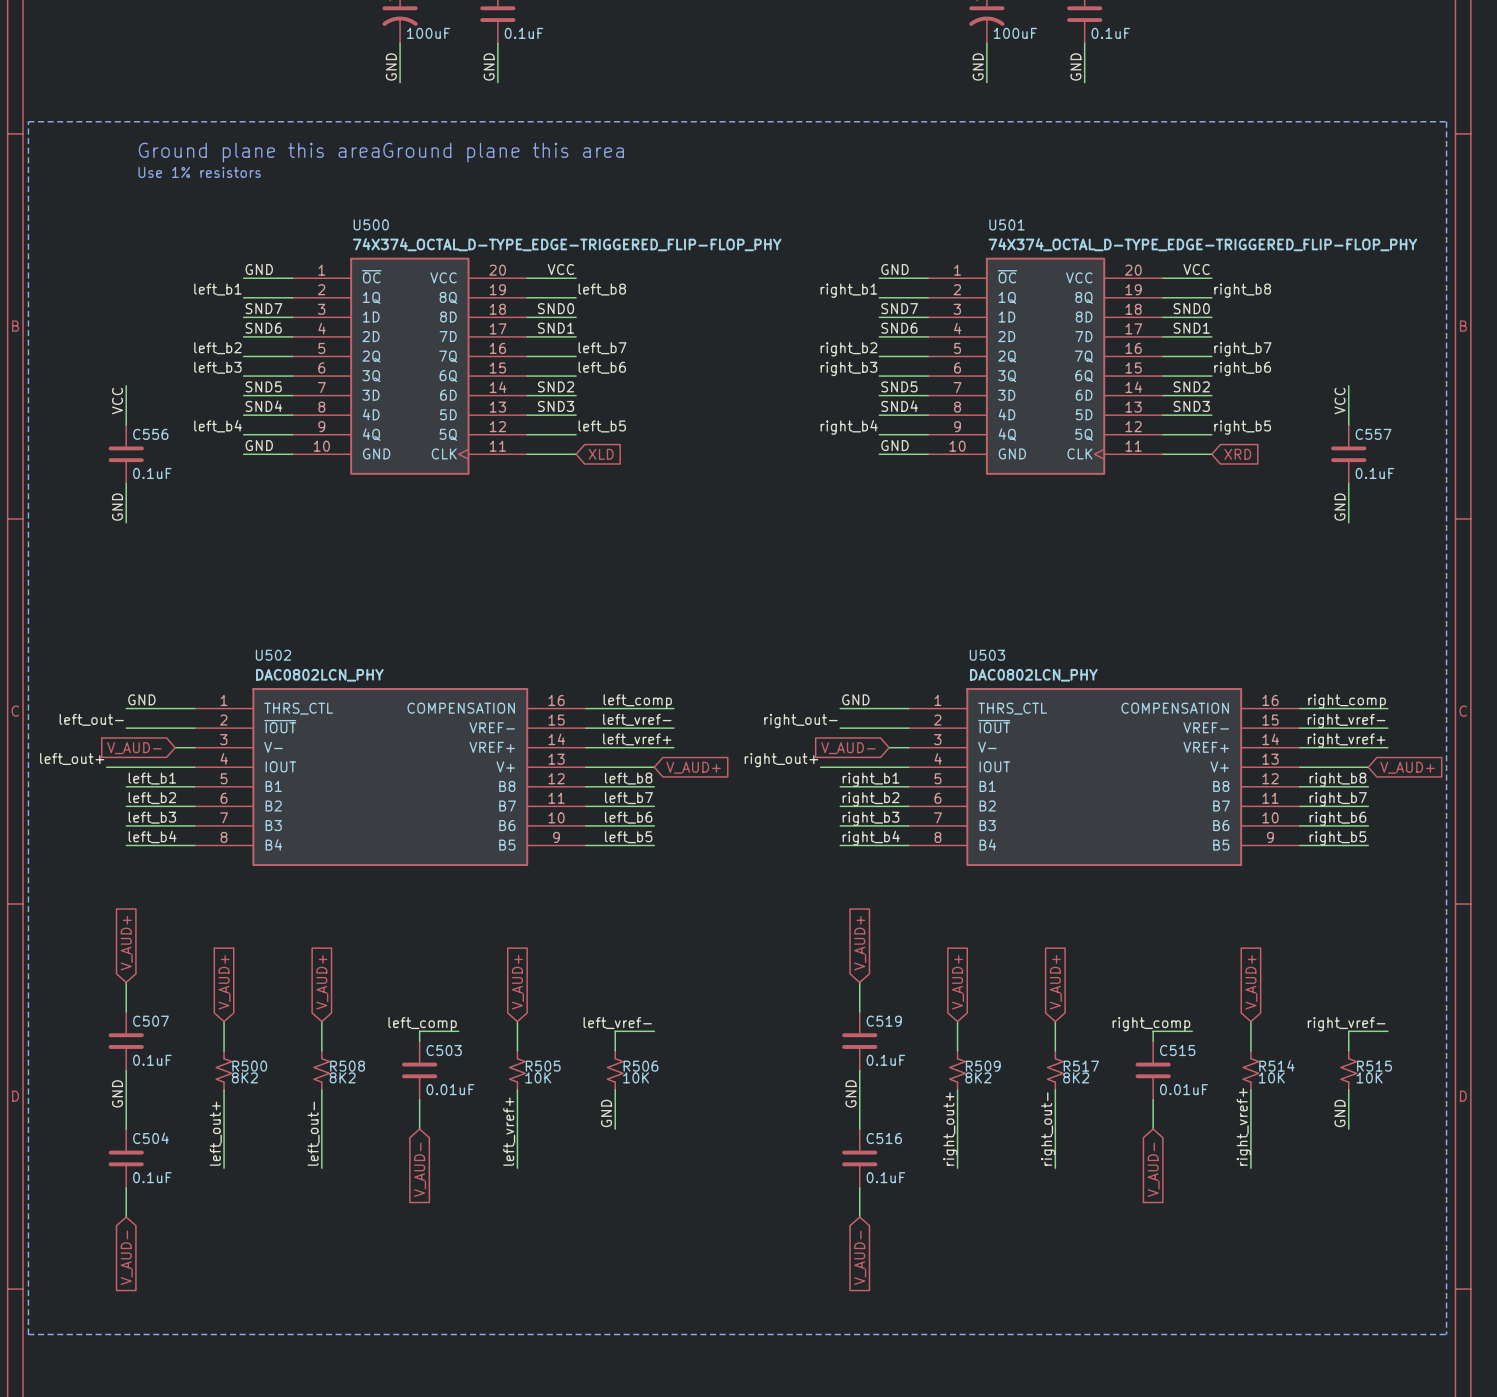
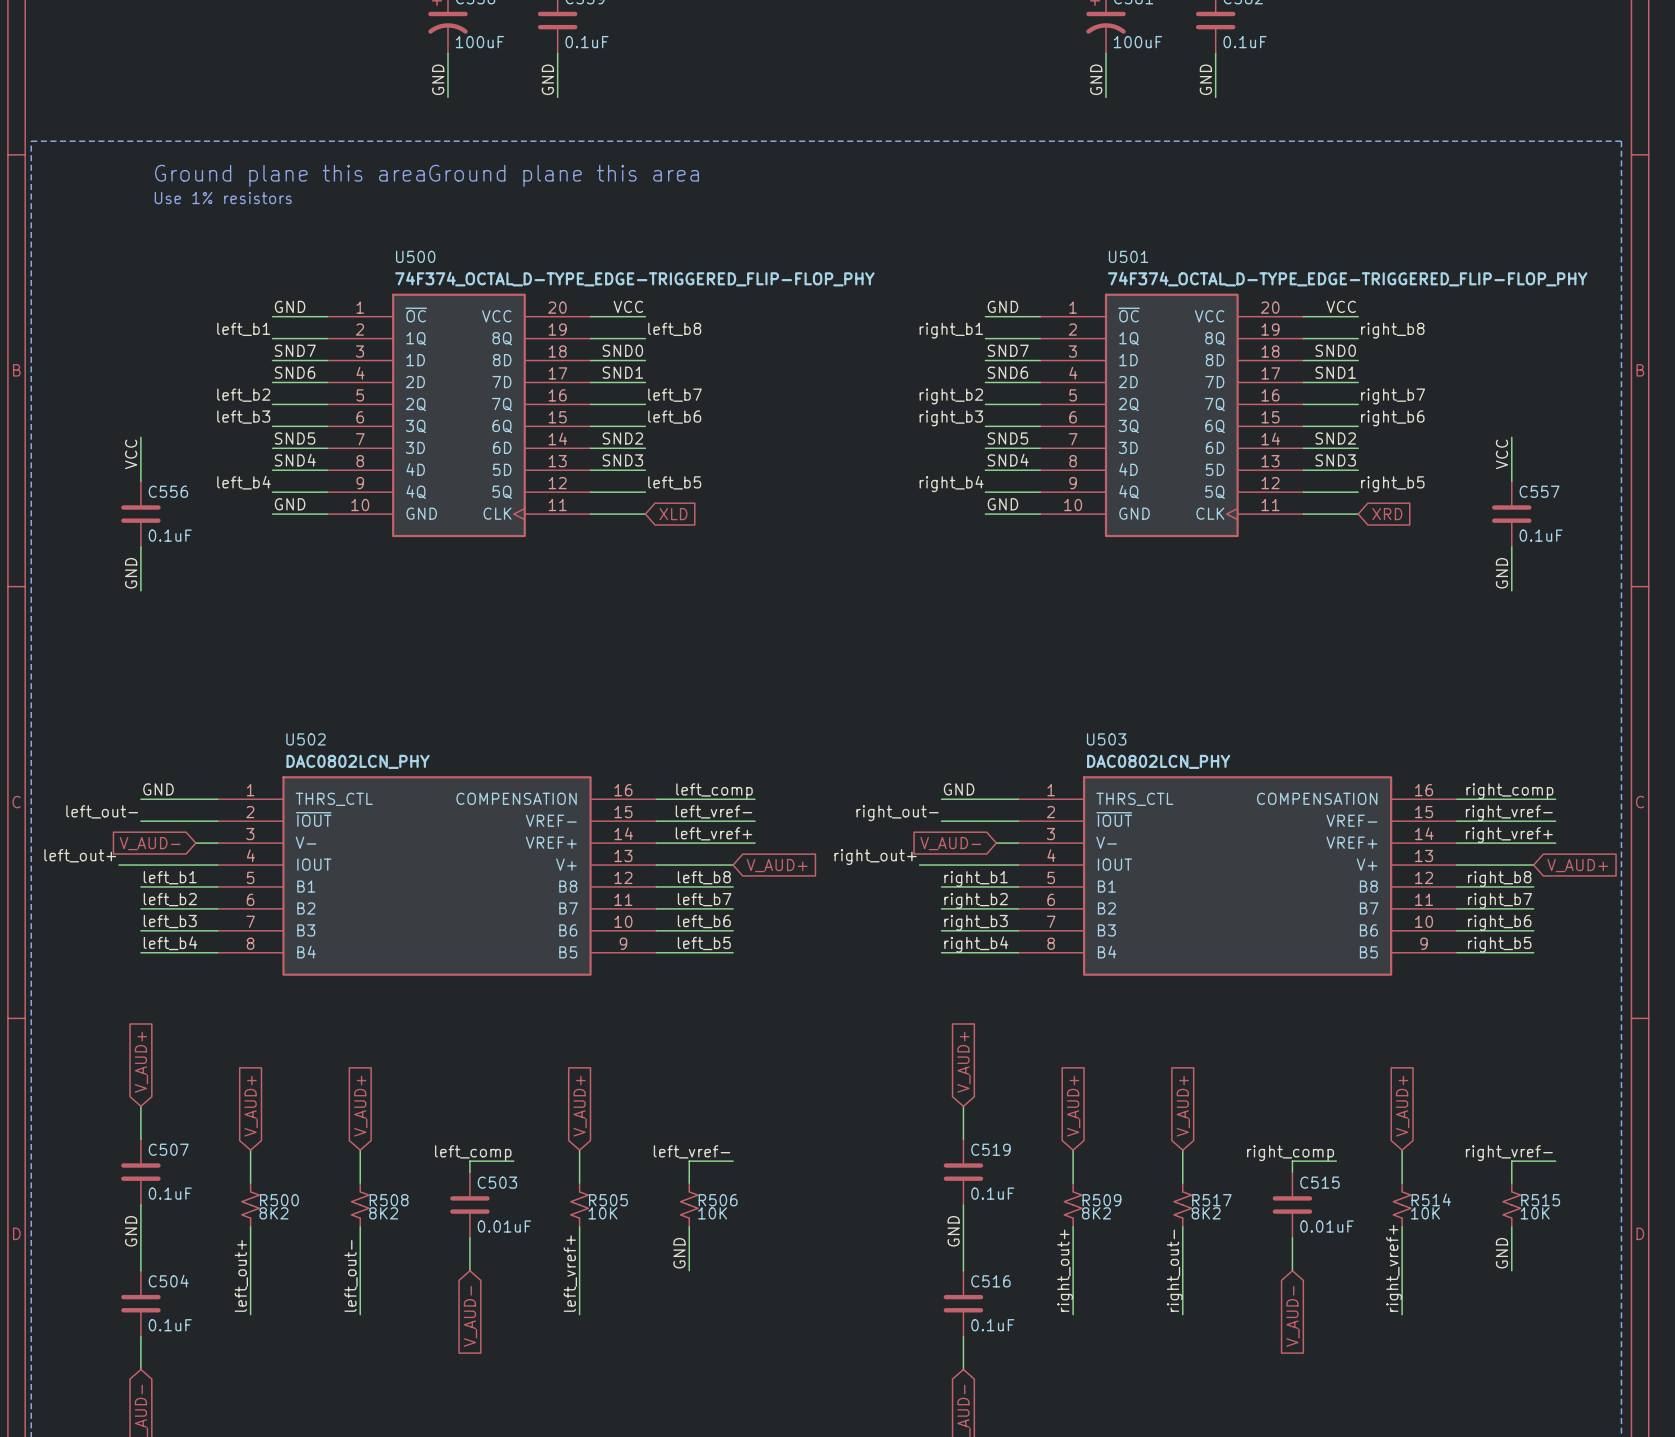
U500 value: 74X374_OCTAL_D-TYPE_EDGE-TRIGGERED_FLIP-FLOP_PHY (567, 244) -> 74F374_OCTAL_D-TYPE_EDGE-TRIGGERED_FLIP-FLOP_PHY (634, 279)
U501 value: 74X374_OCTAL_D-TYPE_EDGE-TRIGGERED_FLIP-FLOP_PHY (1202, 244) -> 74F374_OCTAL_D-TYPE_EDGE-TRIGGERED_FLIP-FLOP_PHY (1347, 279)

